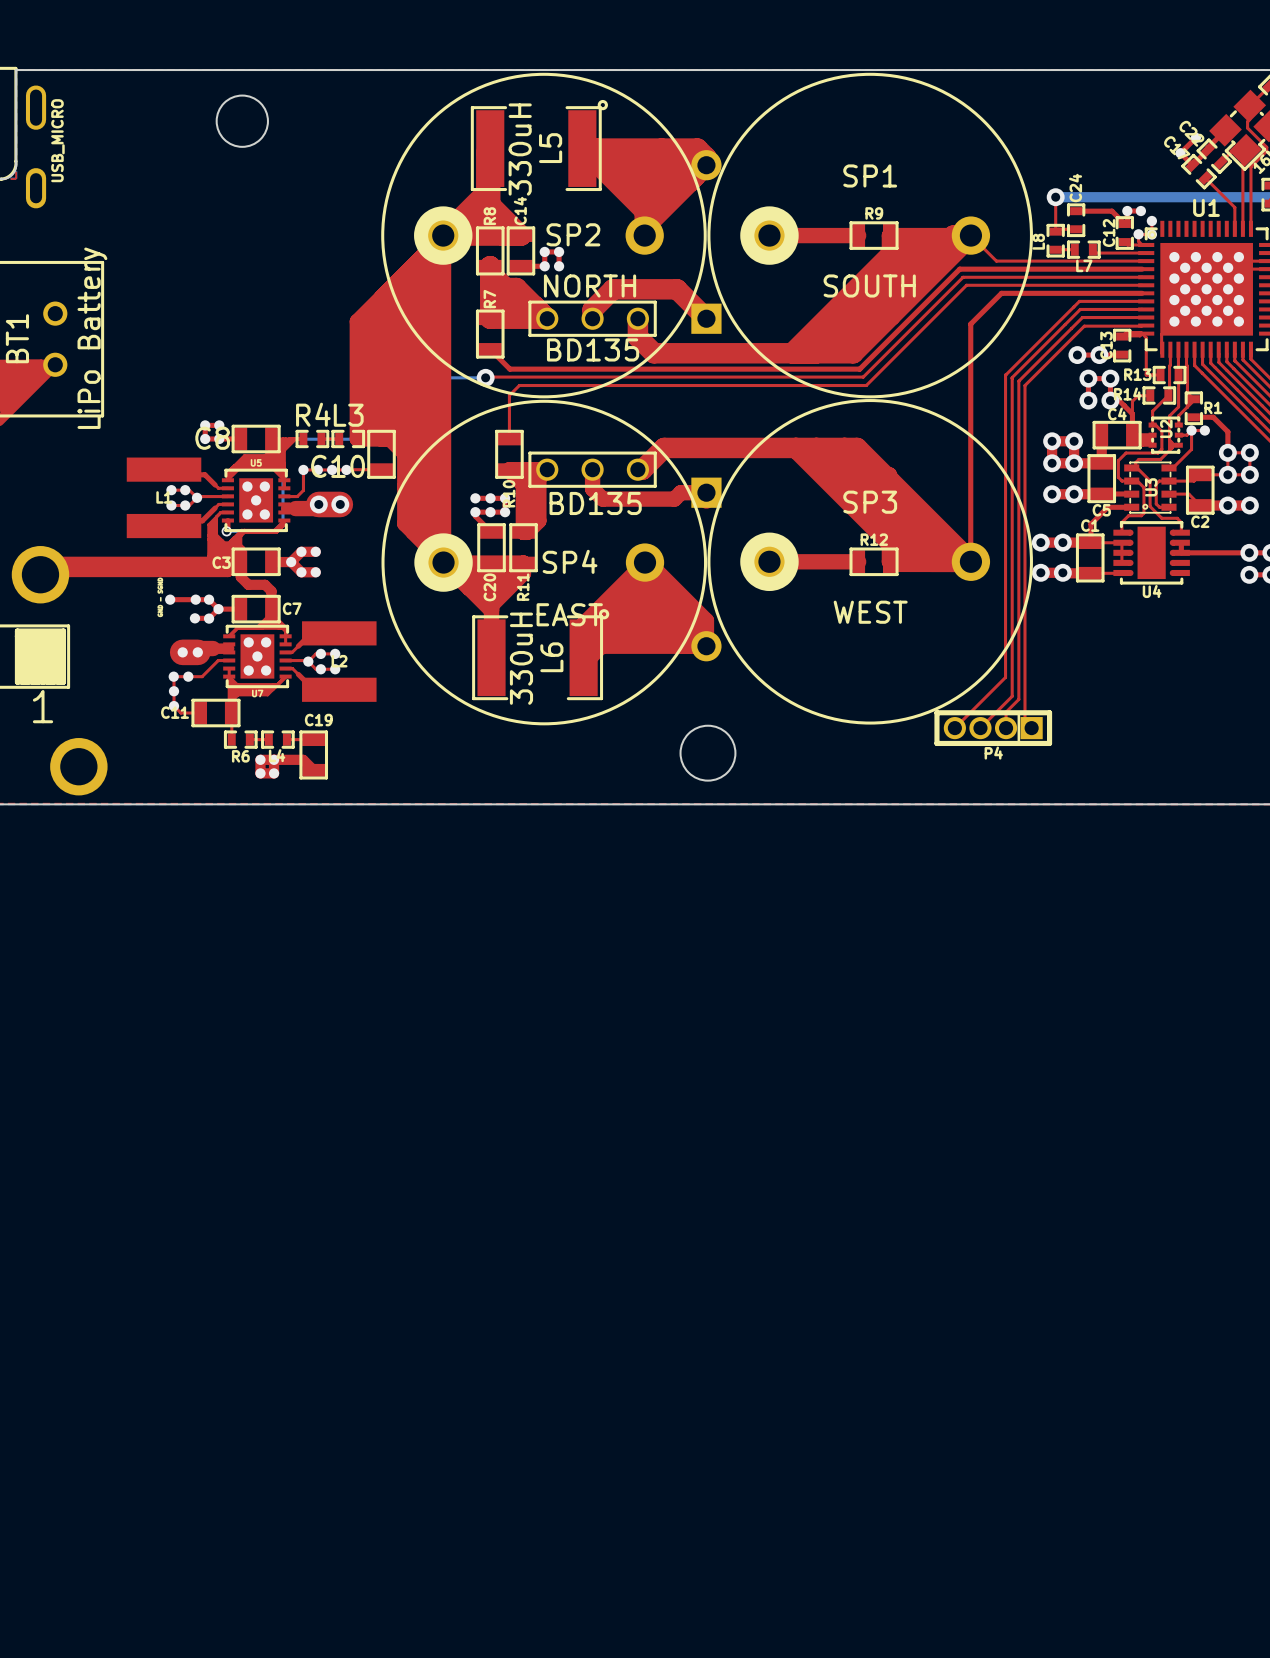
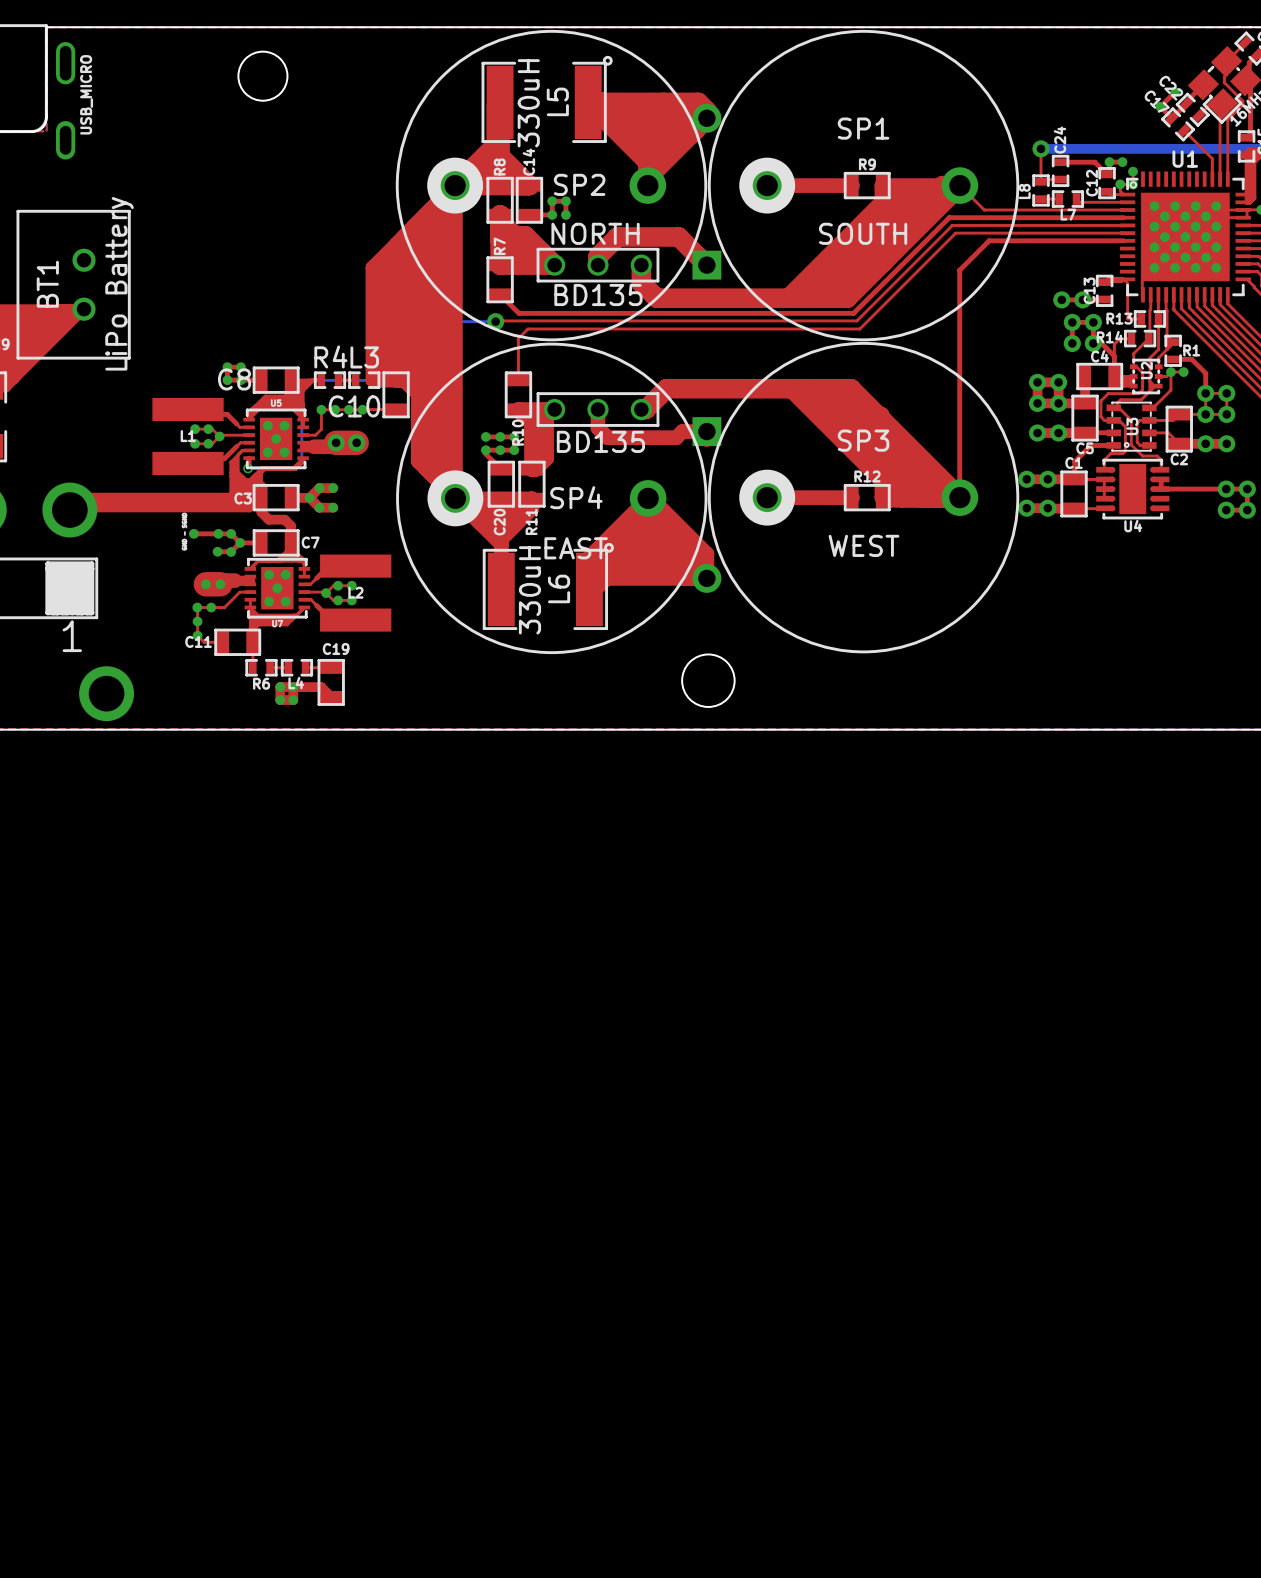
top track: (1142, 301) (1079, 301) (1005, 375) -> none
top track: (1142, 309) (1080, 309) (1012, 377) (1012, 696) (980, 728) -> none
top track: (1142, 317) (1082, 317) (1018, 381) (1018, 699) (1006, 712) (1006, 728) -> none
top track: (1142, 325) (1084, 326) (1024, 385) (1024, 721) (1031, 728) -> none
top track: (1005, 375) (1005, 677) (954, 728) -> none
P4: (993, 728) -> none

